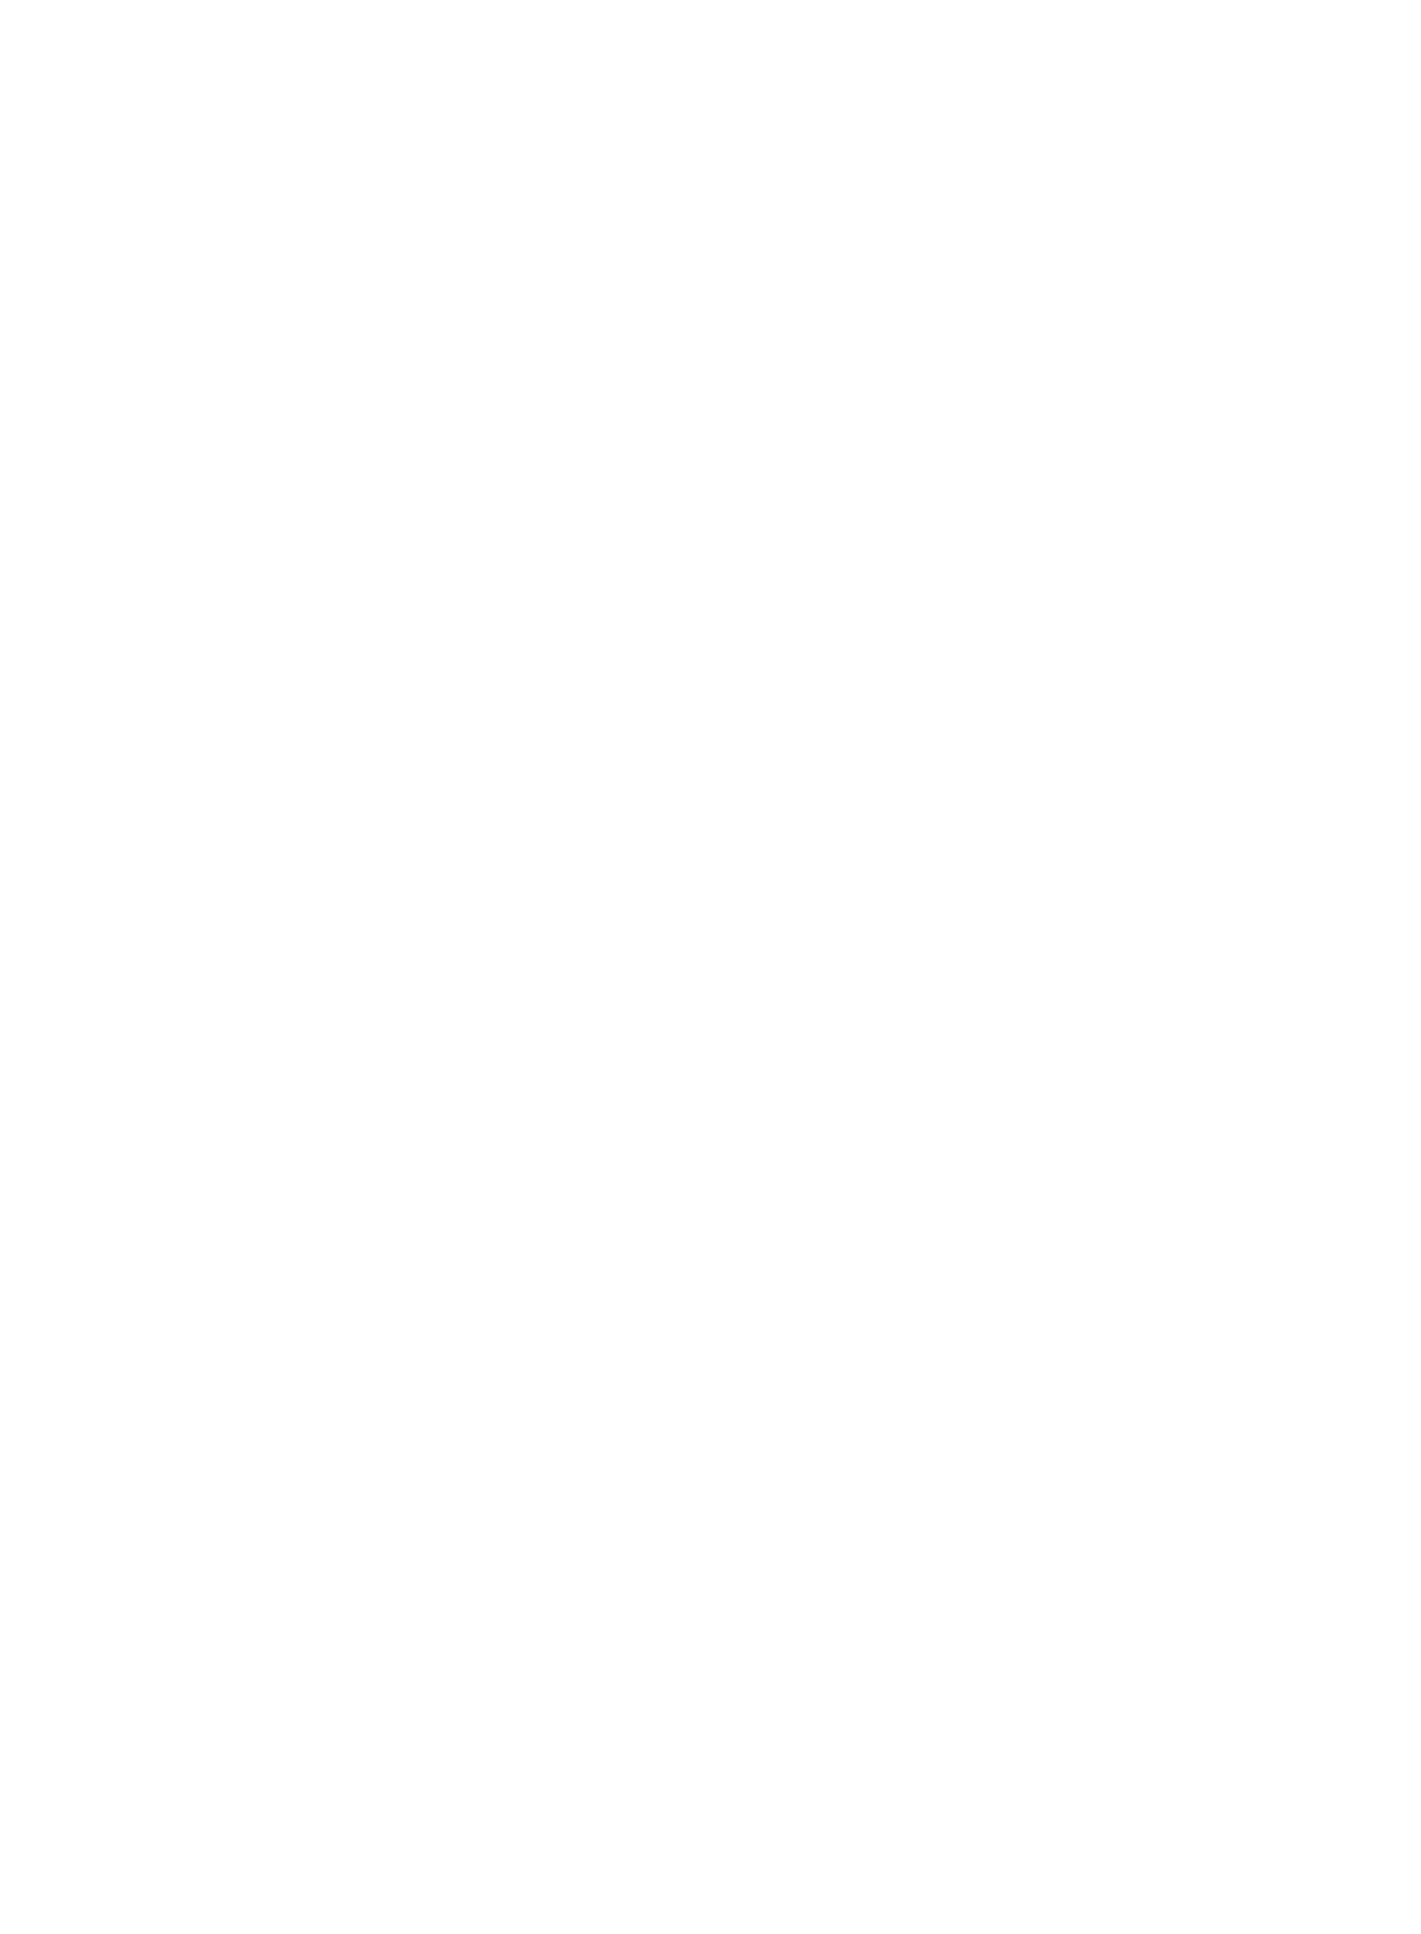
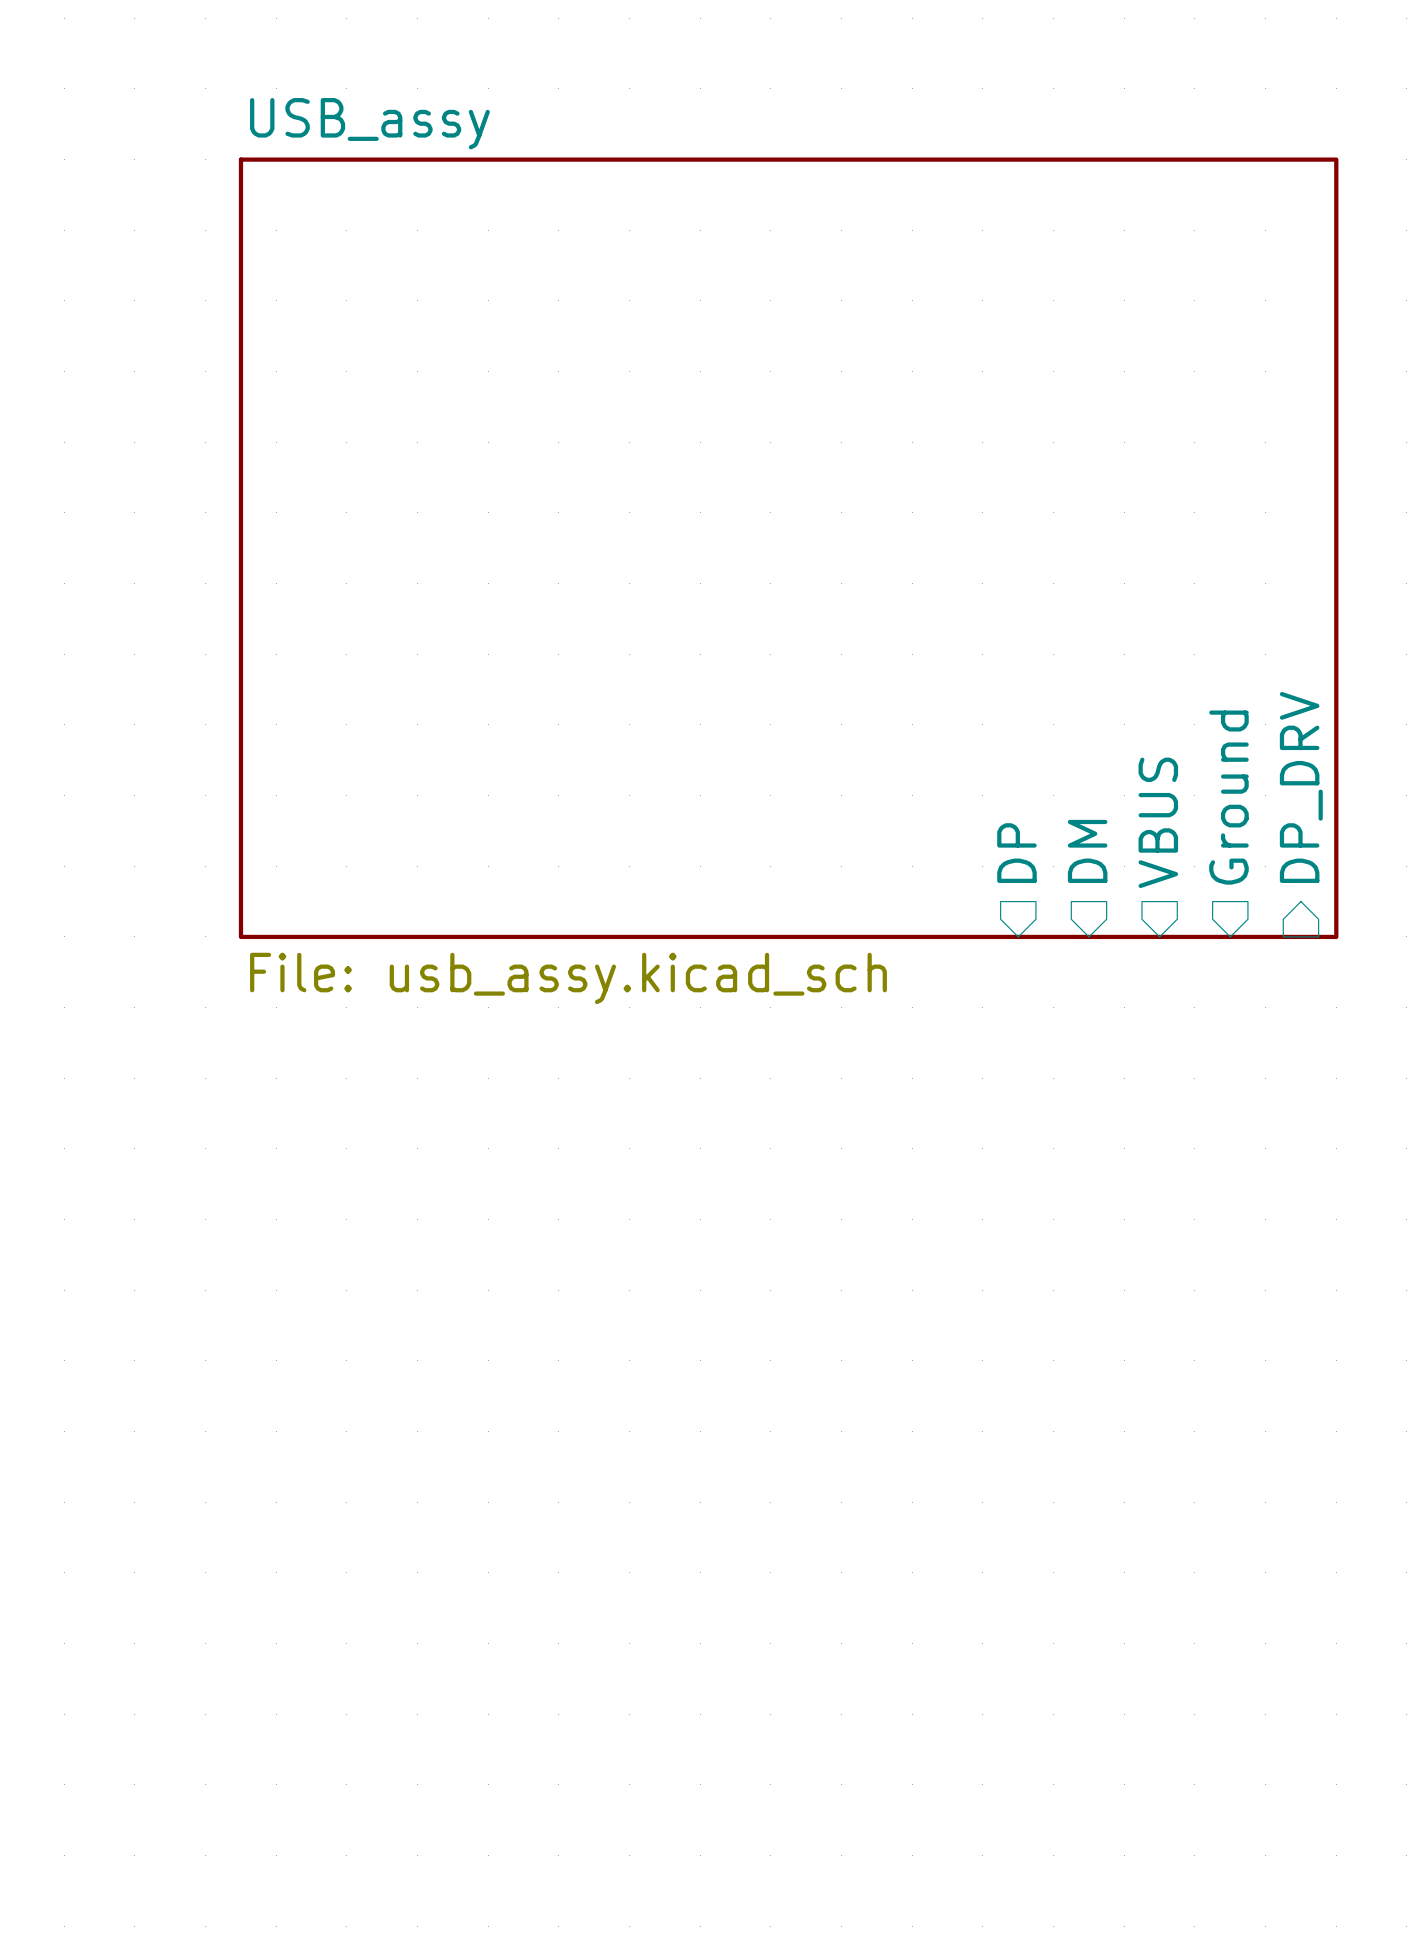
sheet USB_assy: none -> File: usb_assy.kicad_sch (788, 548)
sheet pin: none -> DP_DRV (1301, 787)
sheet pin: none -> Ground (1228, 797)
sheet pin: none -> VBUS (1158, 822)
sheet pin: none -> DM (1087, 851)
sheet pin: none -> DP (1016, 853)

